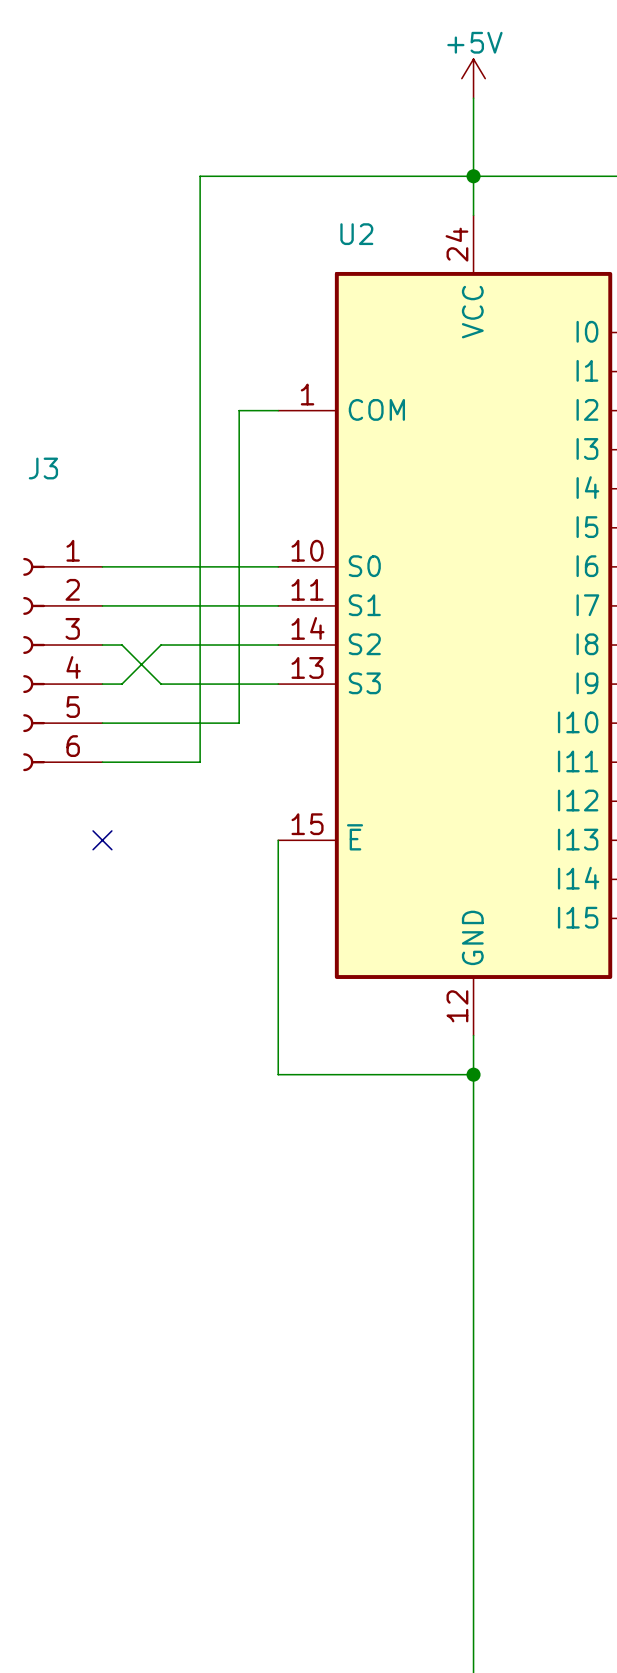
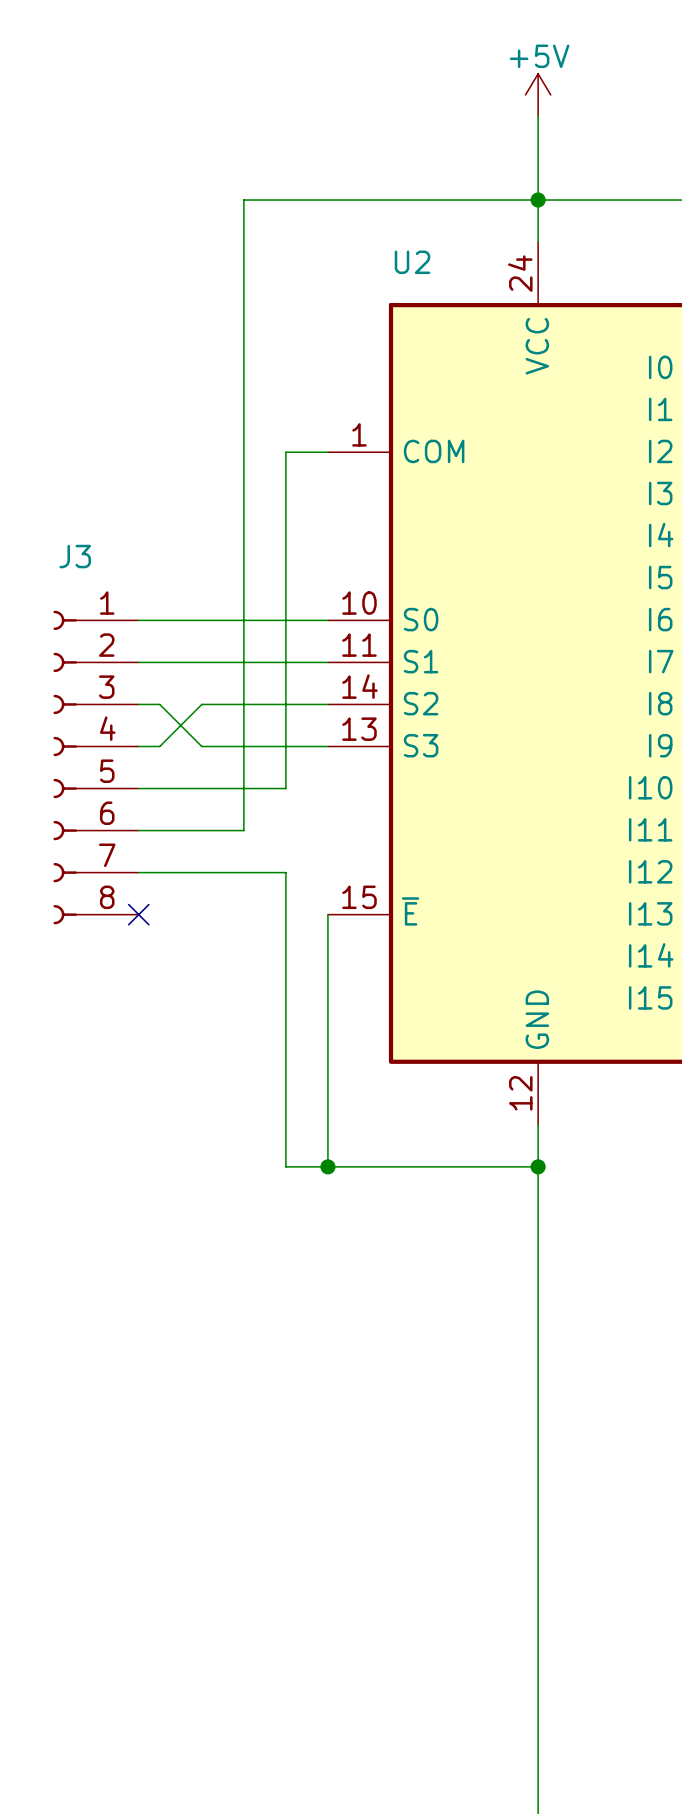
J3 symbol: [23, 557, 103, 772] -> [53, 610, 139, 925]
wire: none -> (138, 872) (285, 872) (285, 1166) (327, 1166)
junction: none -> (327, 1166)

